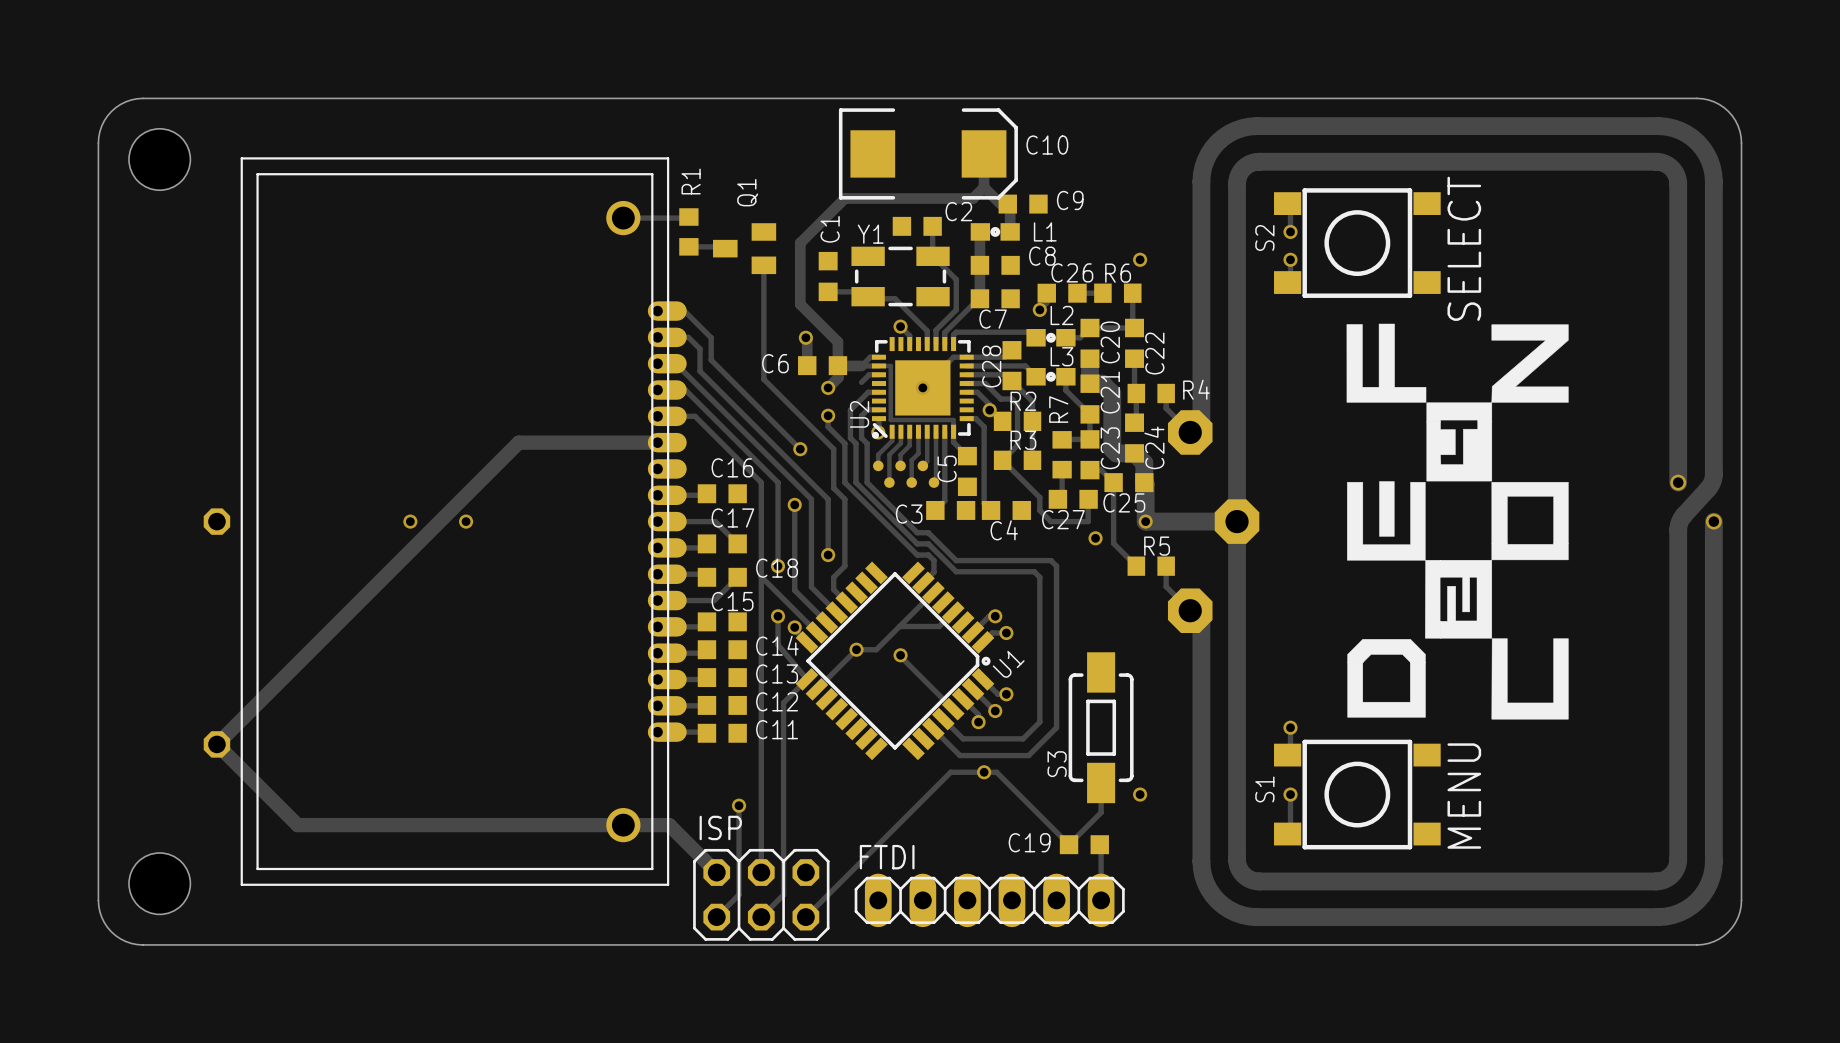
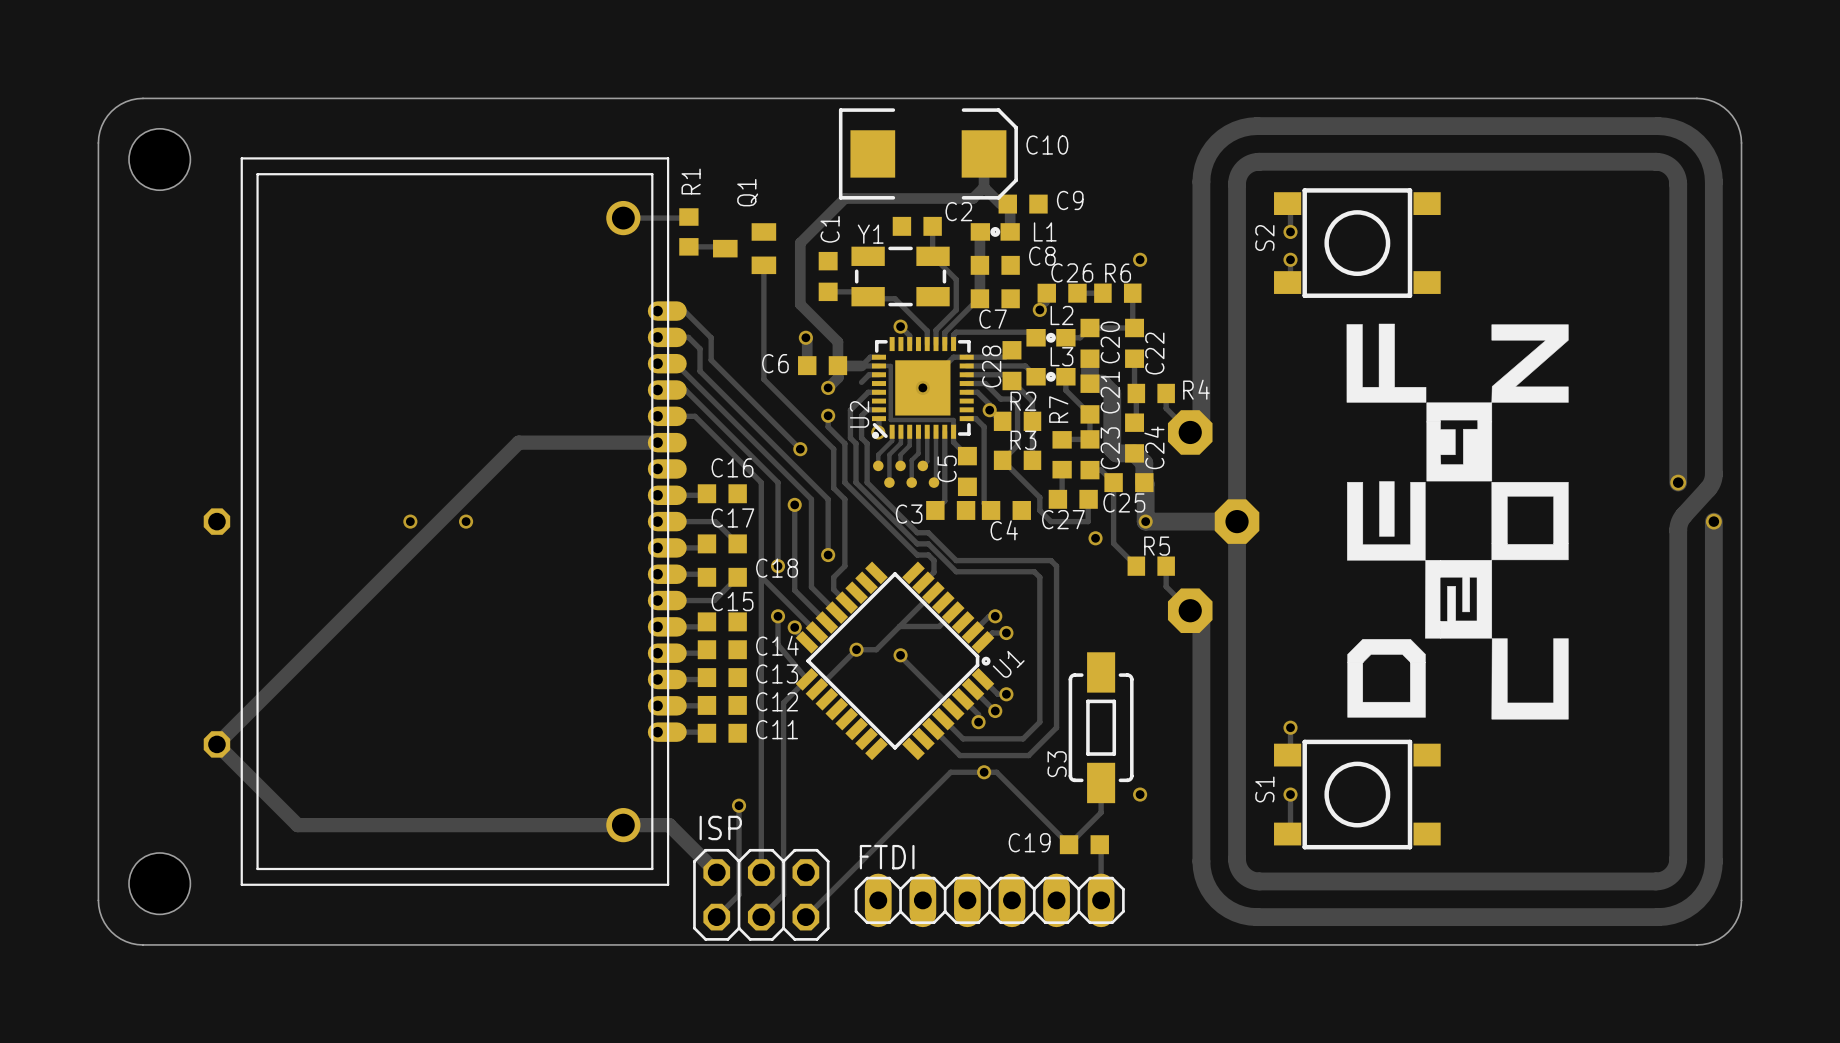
text: SELECT (1464, 248) -> none
text: MENU (1464, 796) -> none

